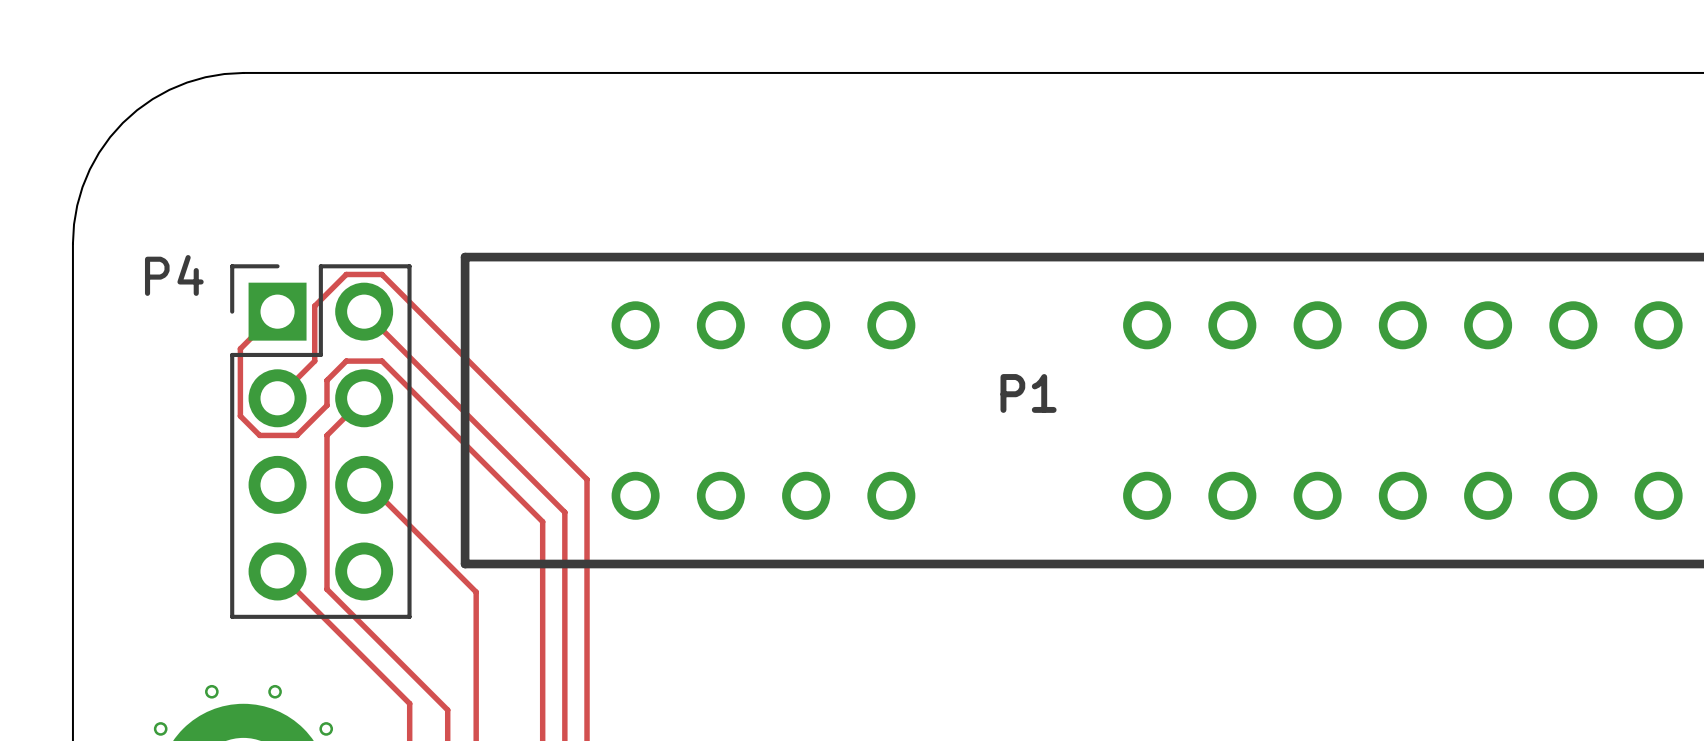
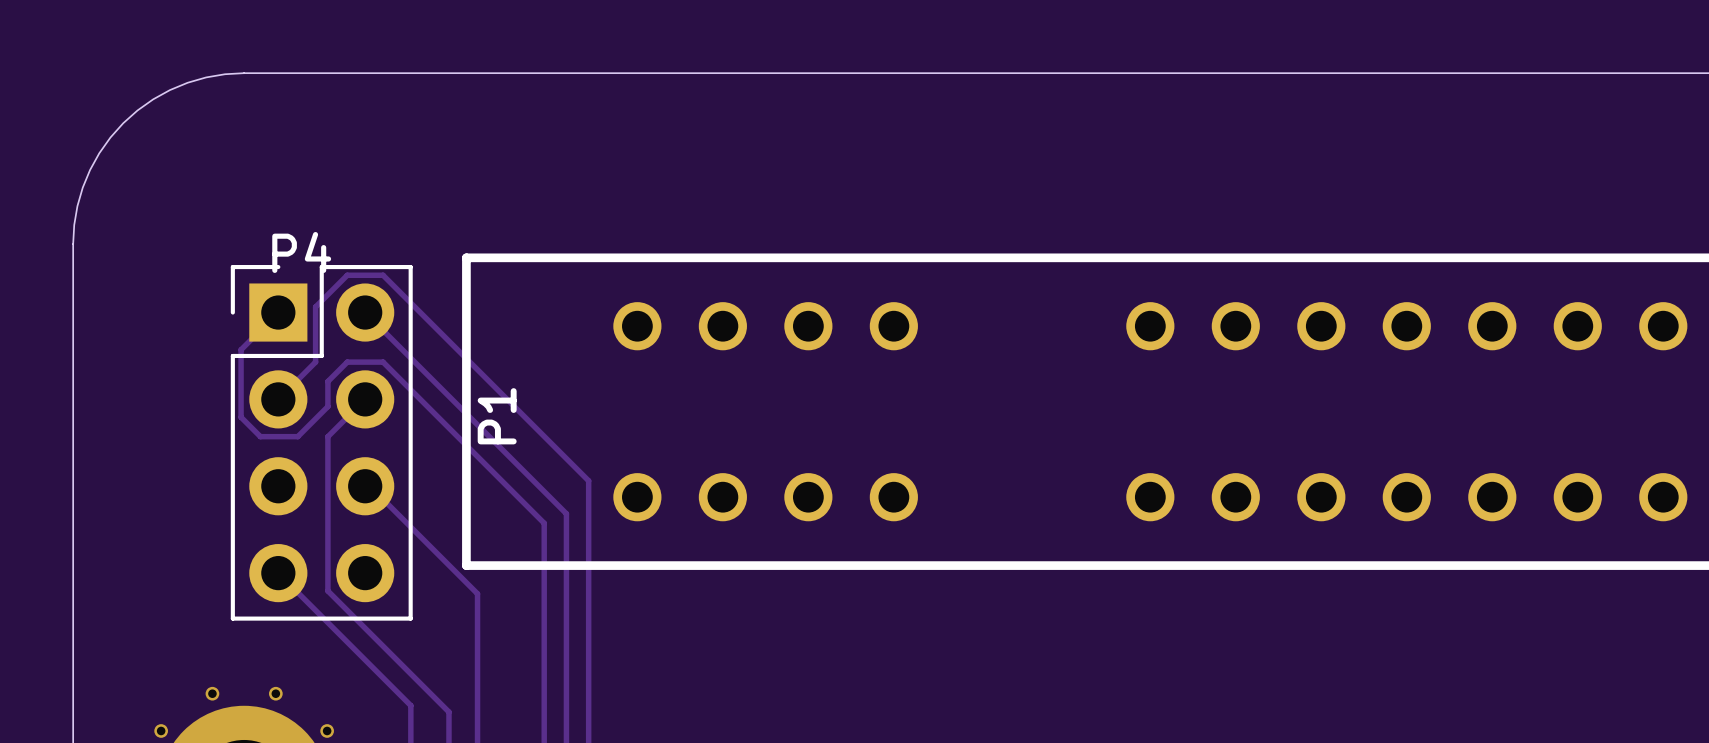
P4 name position: P4 (174, 275) -> P4 (301, 252)
P1 name rotation: 0° (1028, 393) -> 90° counterclockwise (497, 416)
P1 name position: P1 (1028, 393) -> P1 (497, 416)

